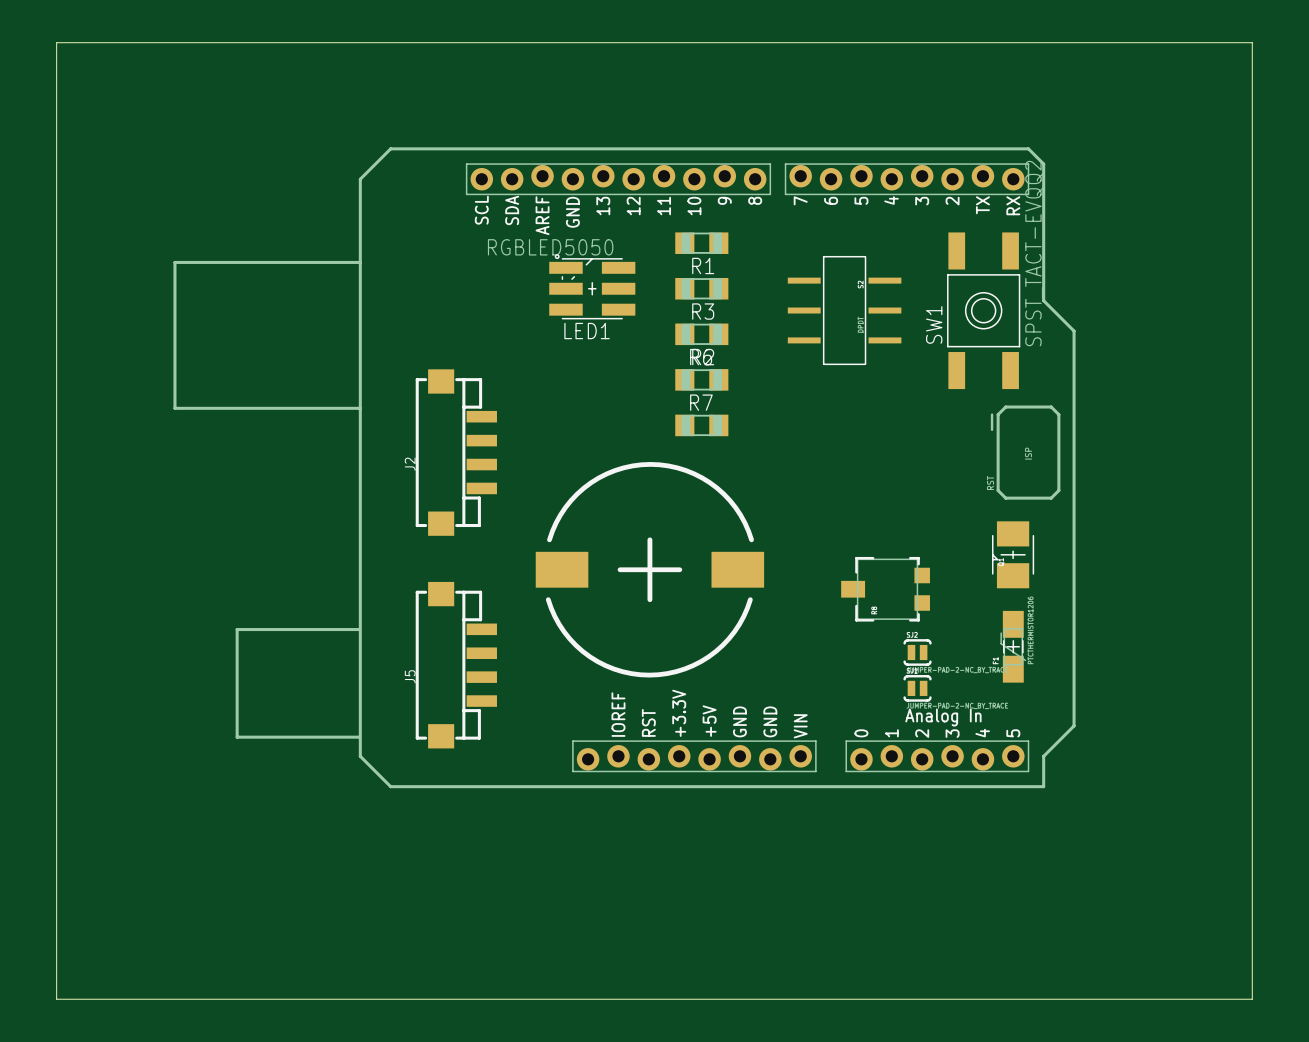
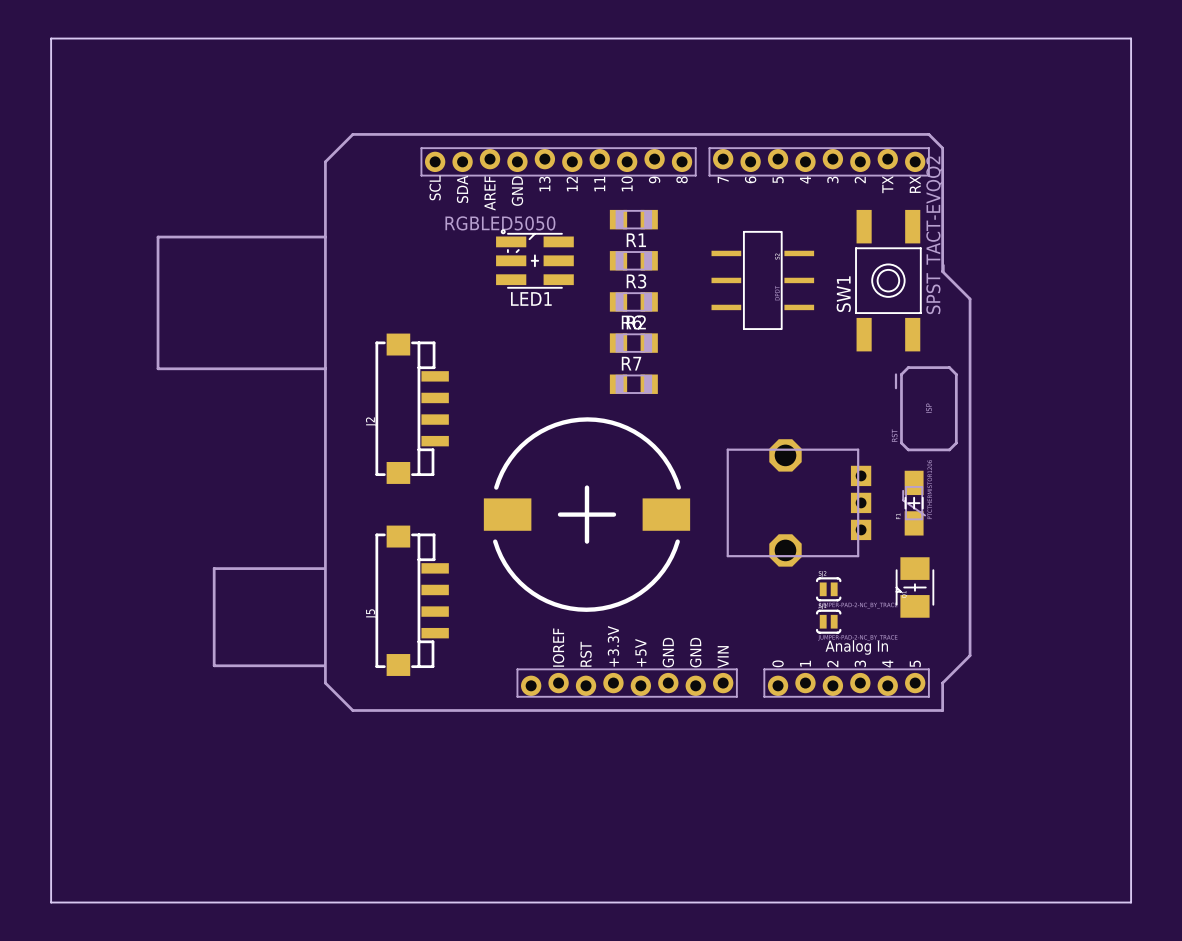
part position: (1013, 554) -> (914, 587)
part: none -> (798, 502)
part: (885, 589) -> none
part position: (1013, 646) -> (914, 503)

